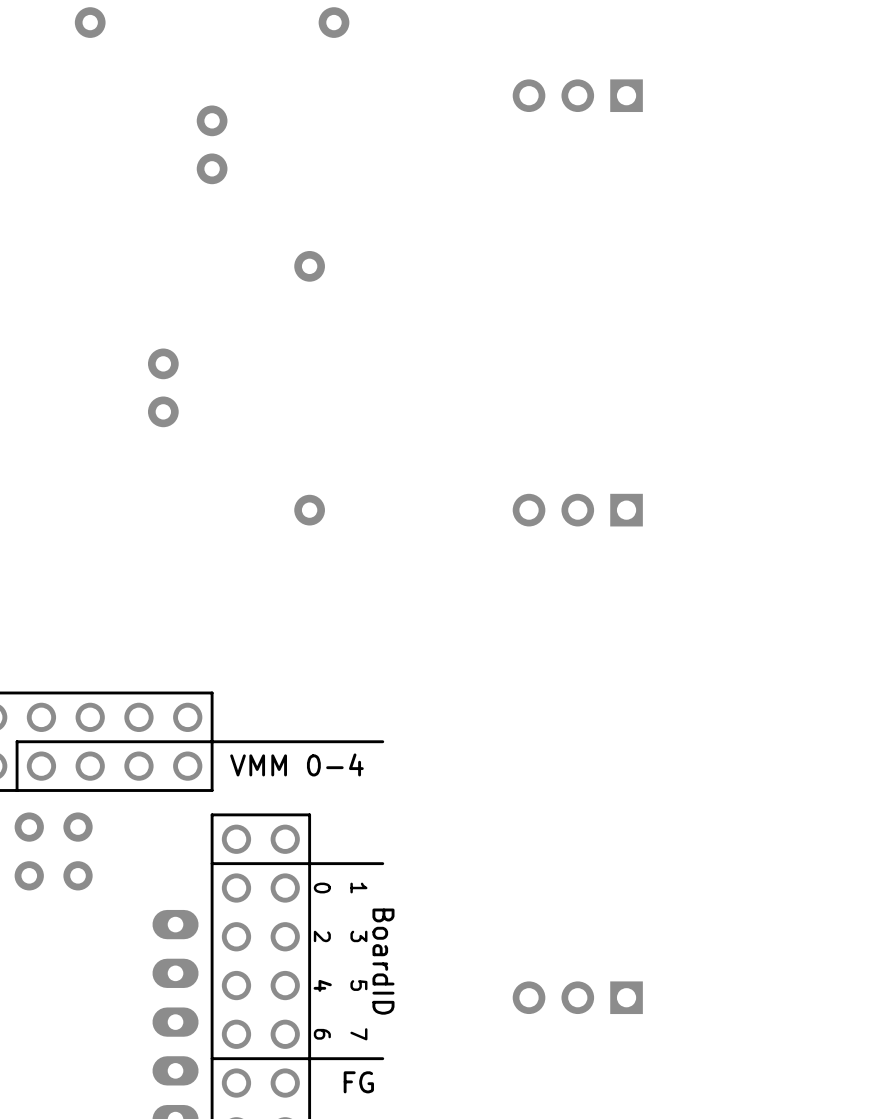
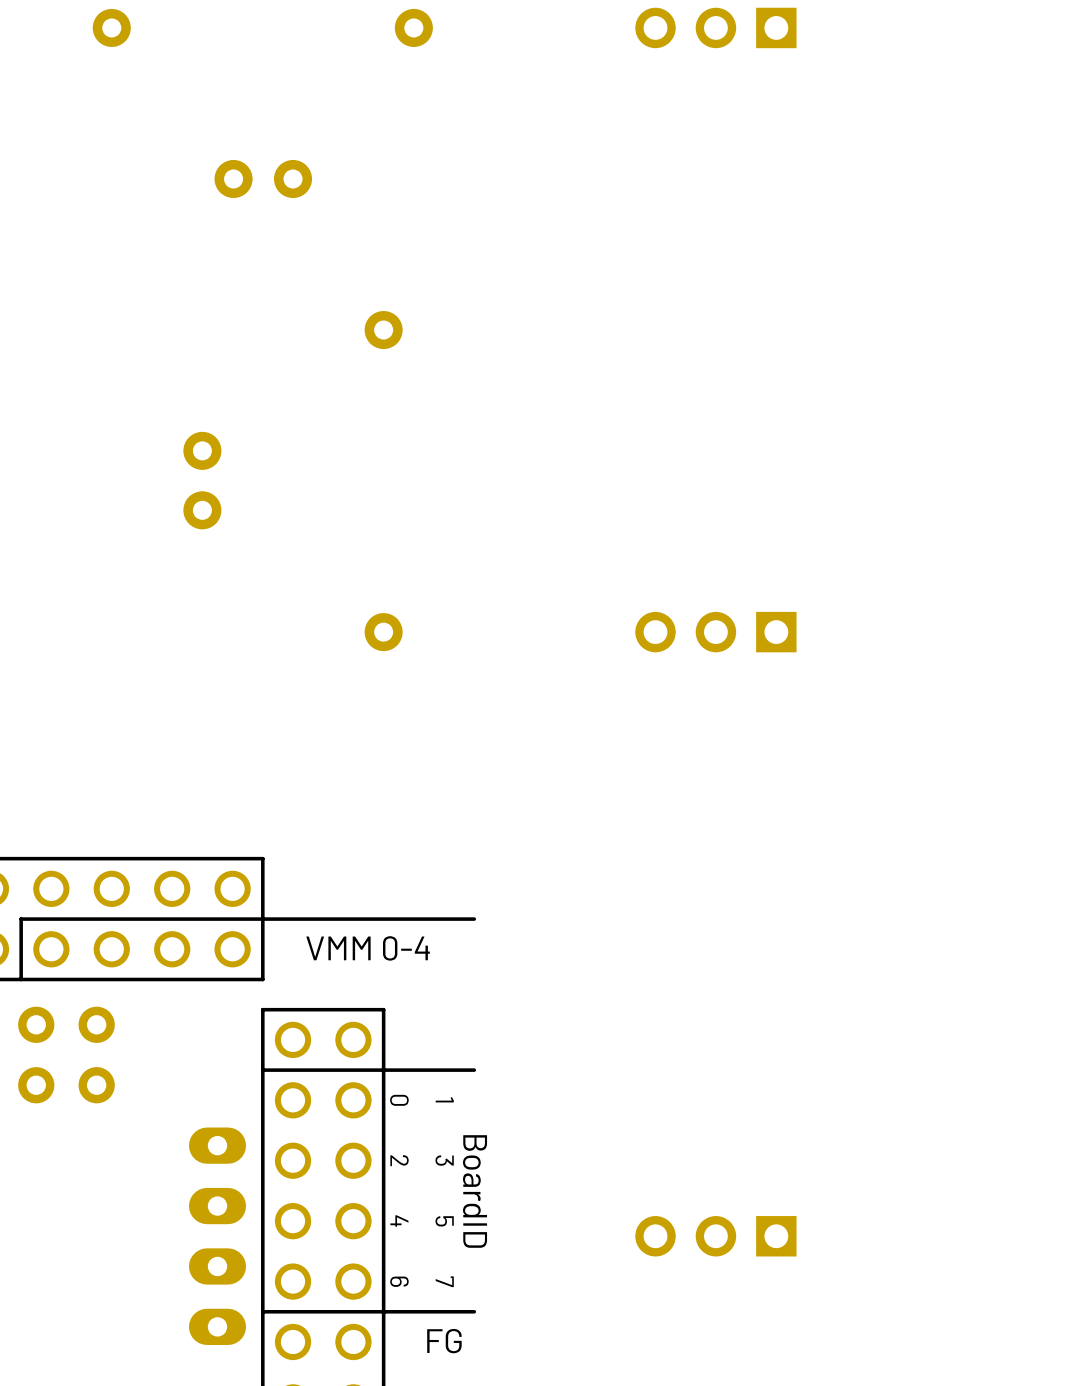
part position: (577, 95) -> (715, 27)
part rotation: 0° (212, 144) -> 90° clockwise (263, 178)

